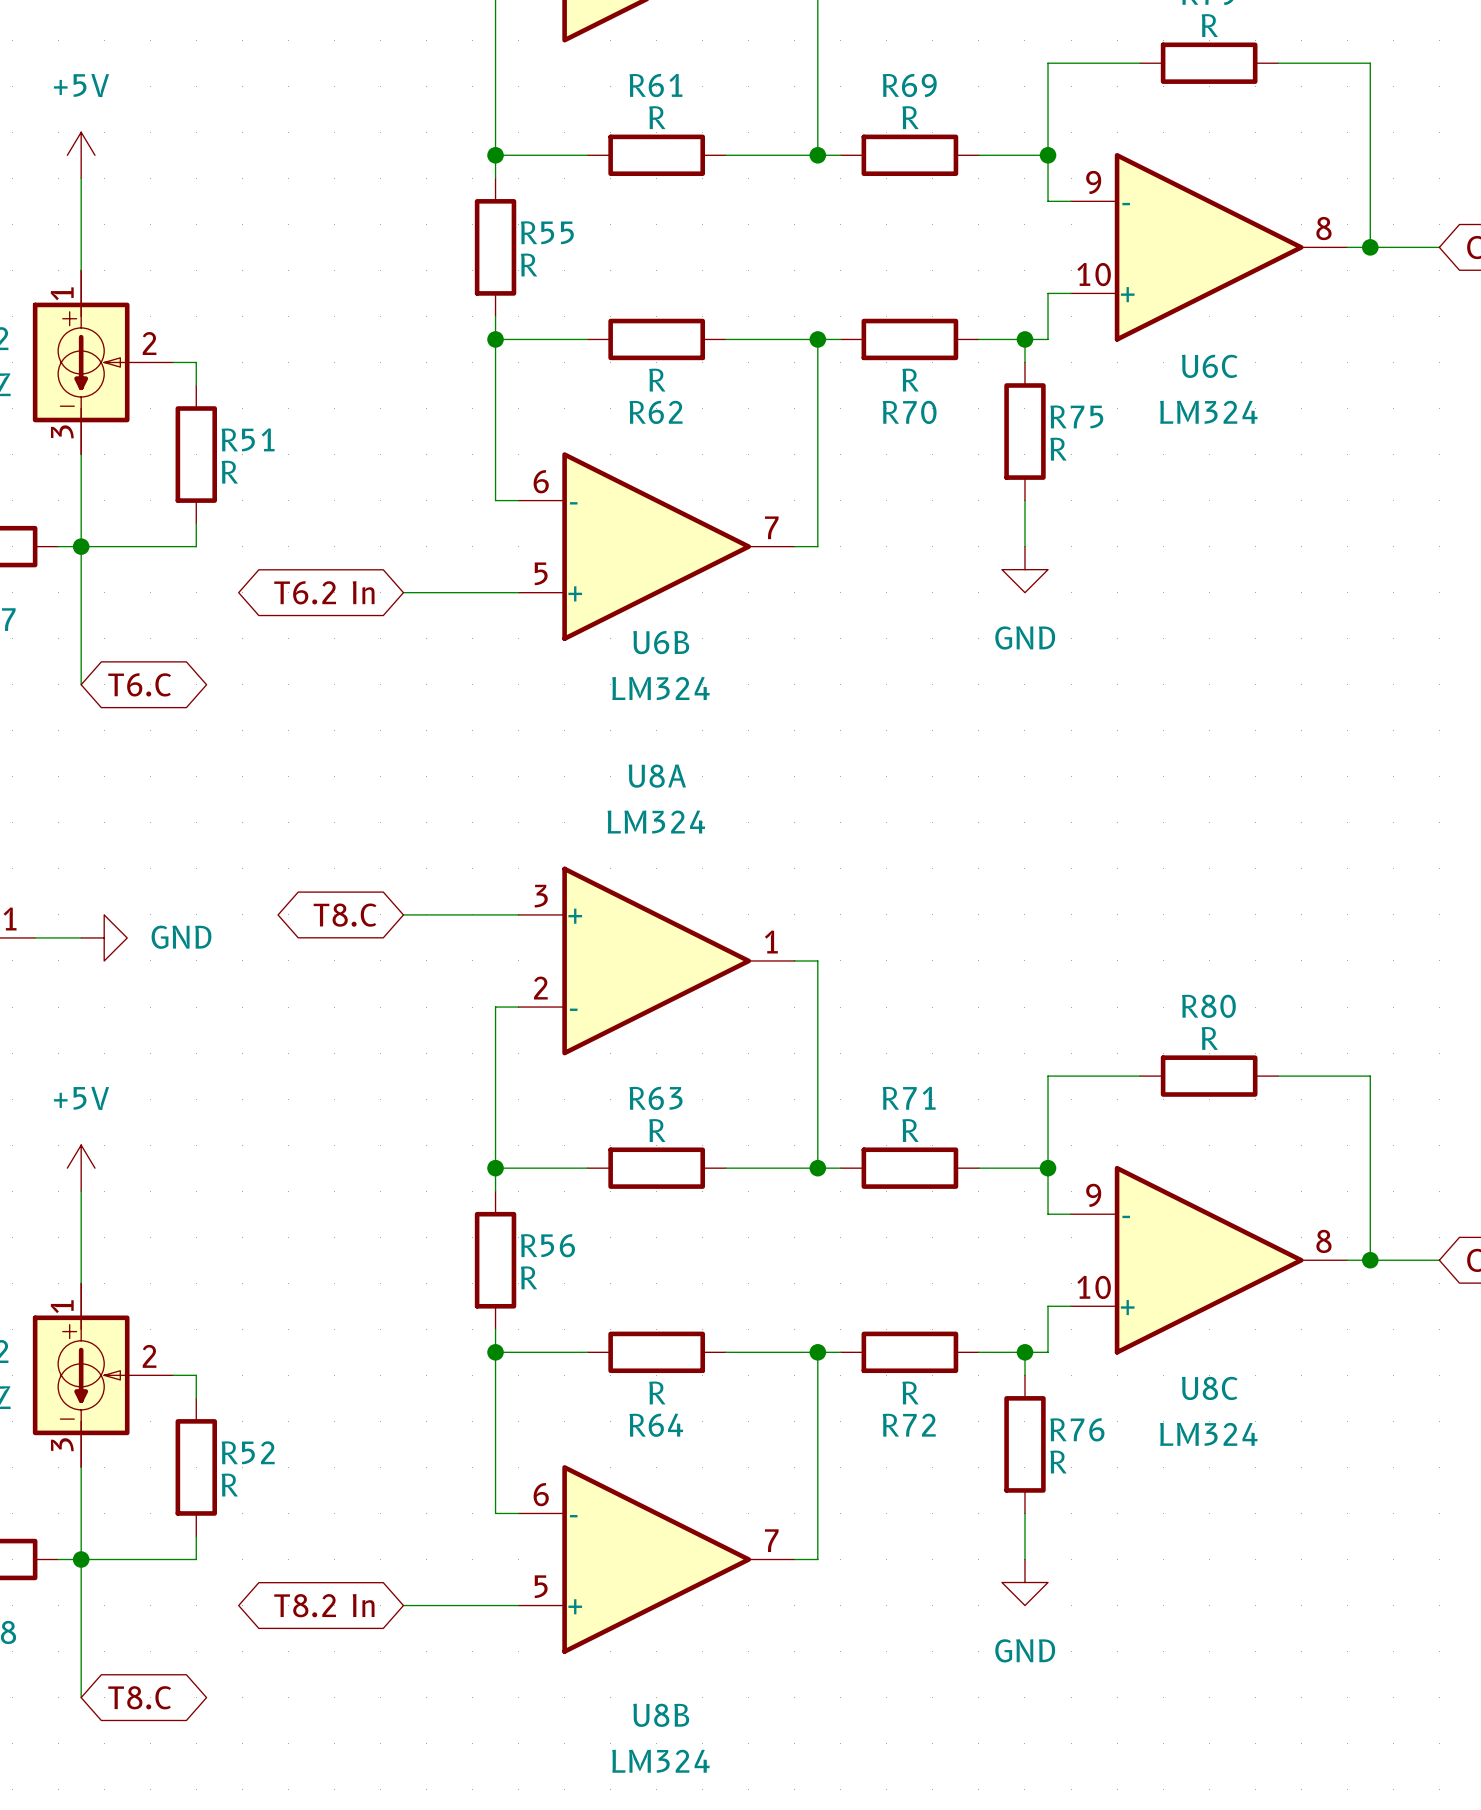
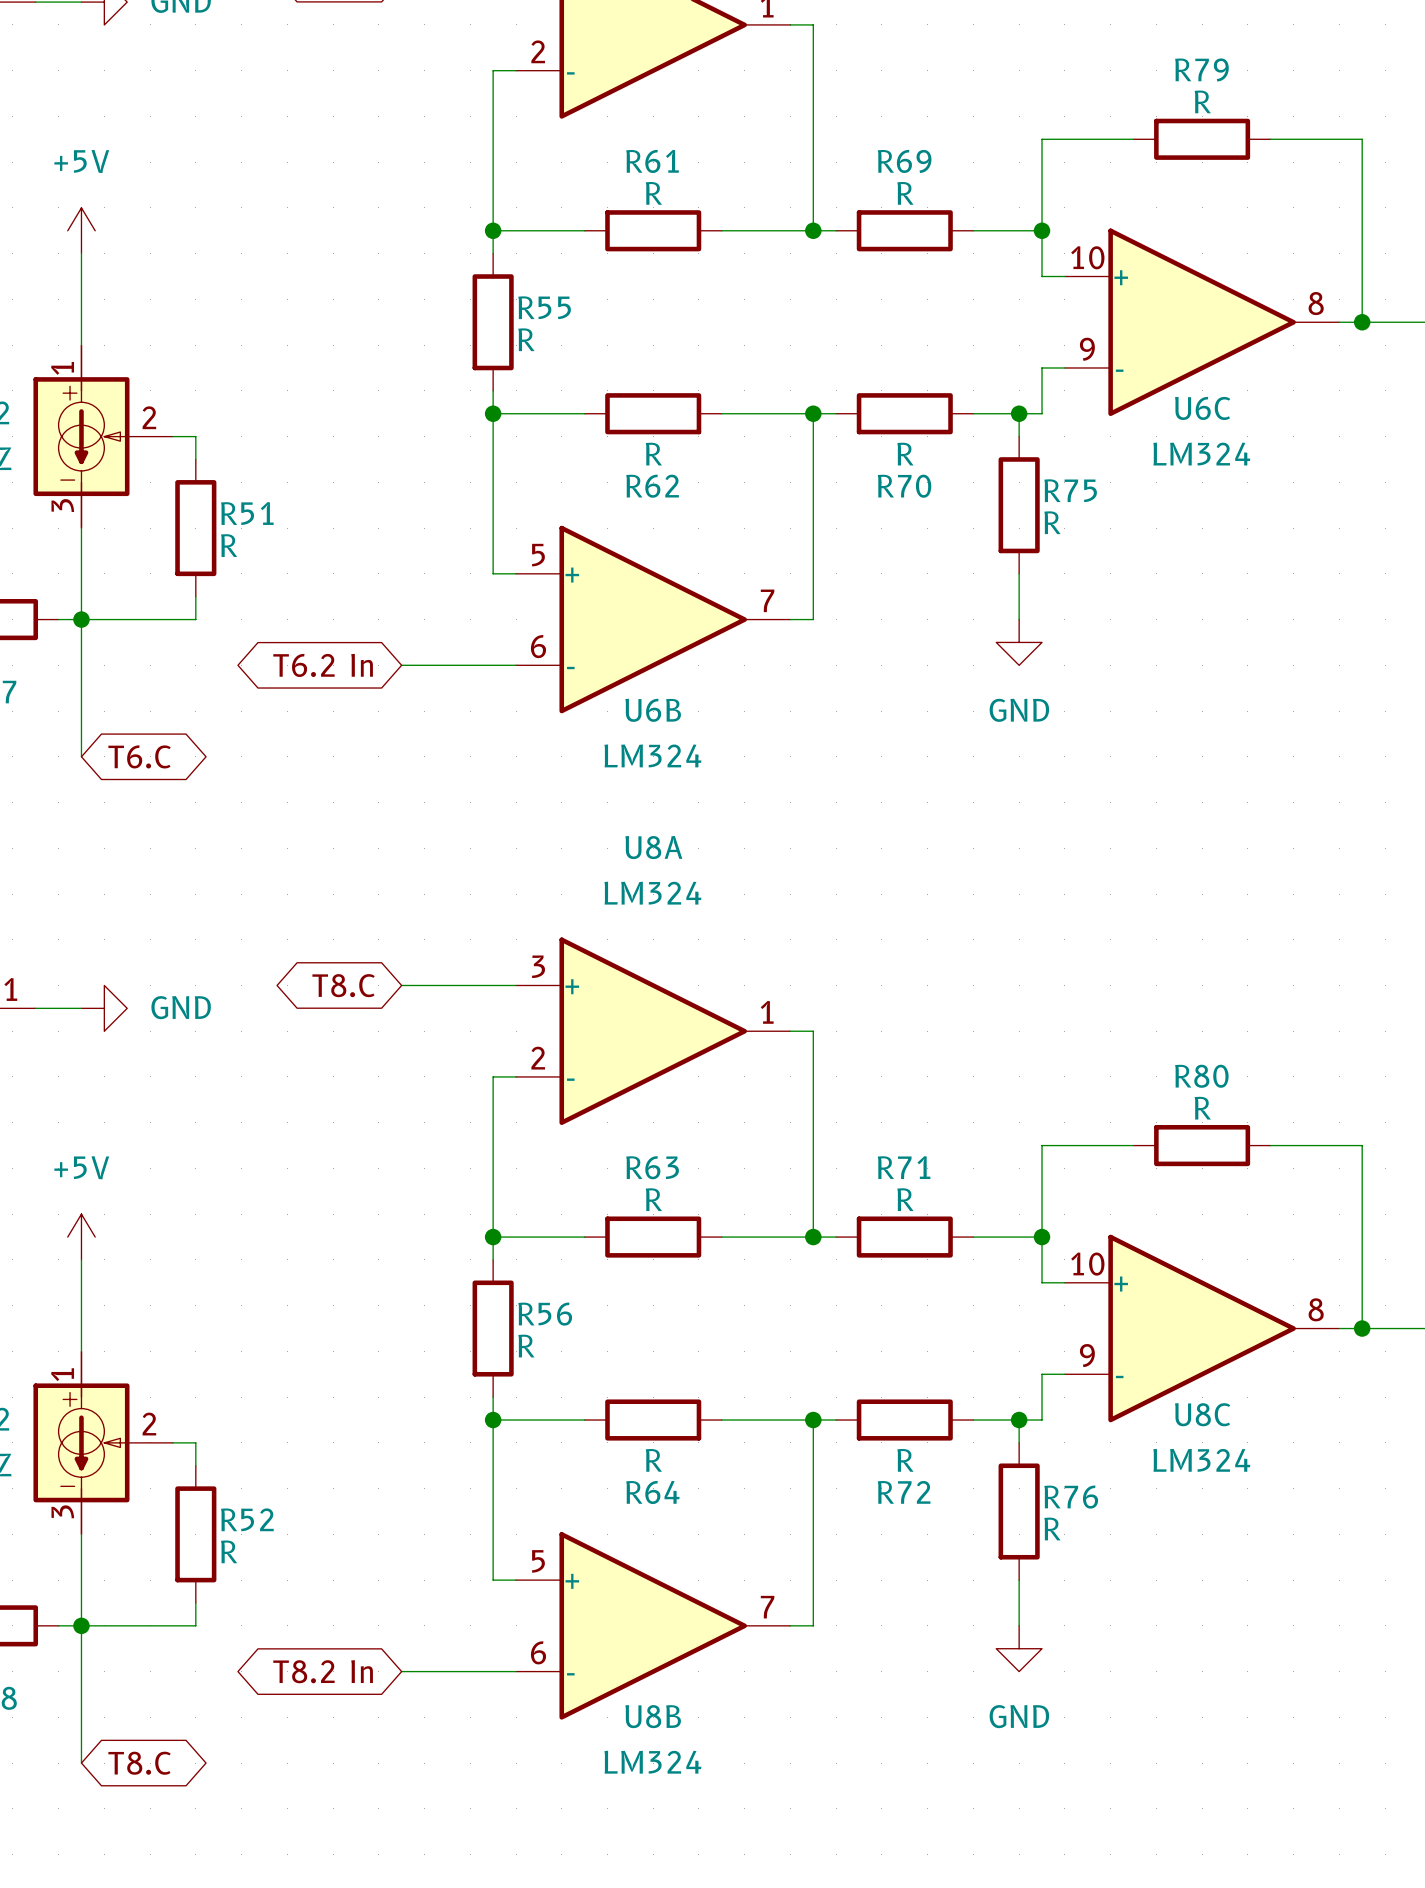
U6C flip: as is (1209, 247) -> up-down (1202, 322)
U6B flip: as is (656, 546) -> up-down (653, 619)
U8C flip: as is (1209, 1260) -> up-down (1202, 1328)
U8C name position: U8C (1209, 1388) -> U8C (1202, 1414)
U8C value position: LM324 (1208, 1434) -> LM324 (1201, 1460)
U8B flip: as is (656, 1559) -> up-down (653, 1625)
U8B name position: U8B (661, 1715) -> U8B (653, 1716)
U8B value position: LM324 (660, 1761) -> LM324 (652, 1762)

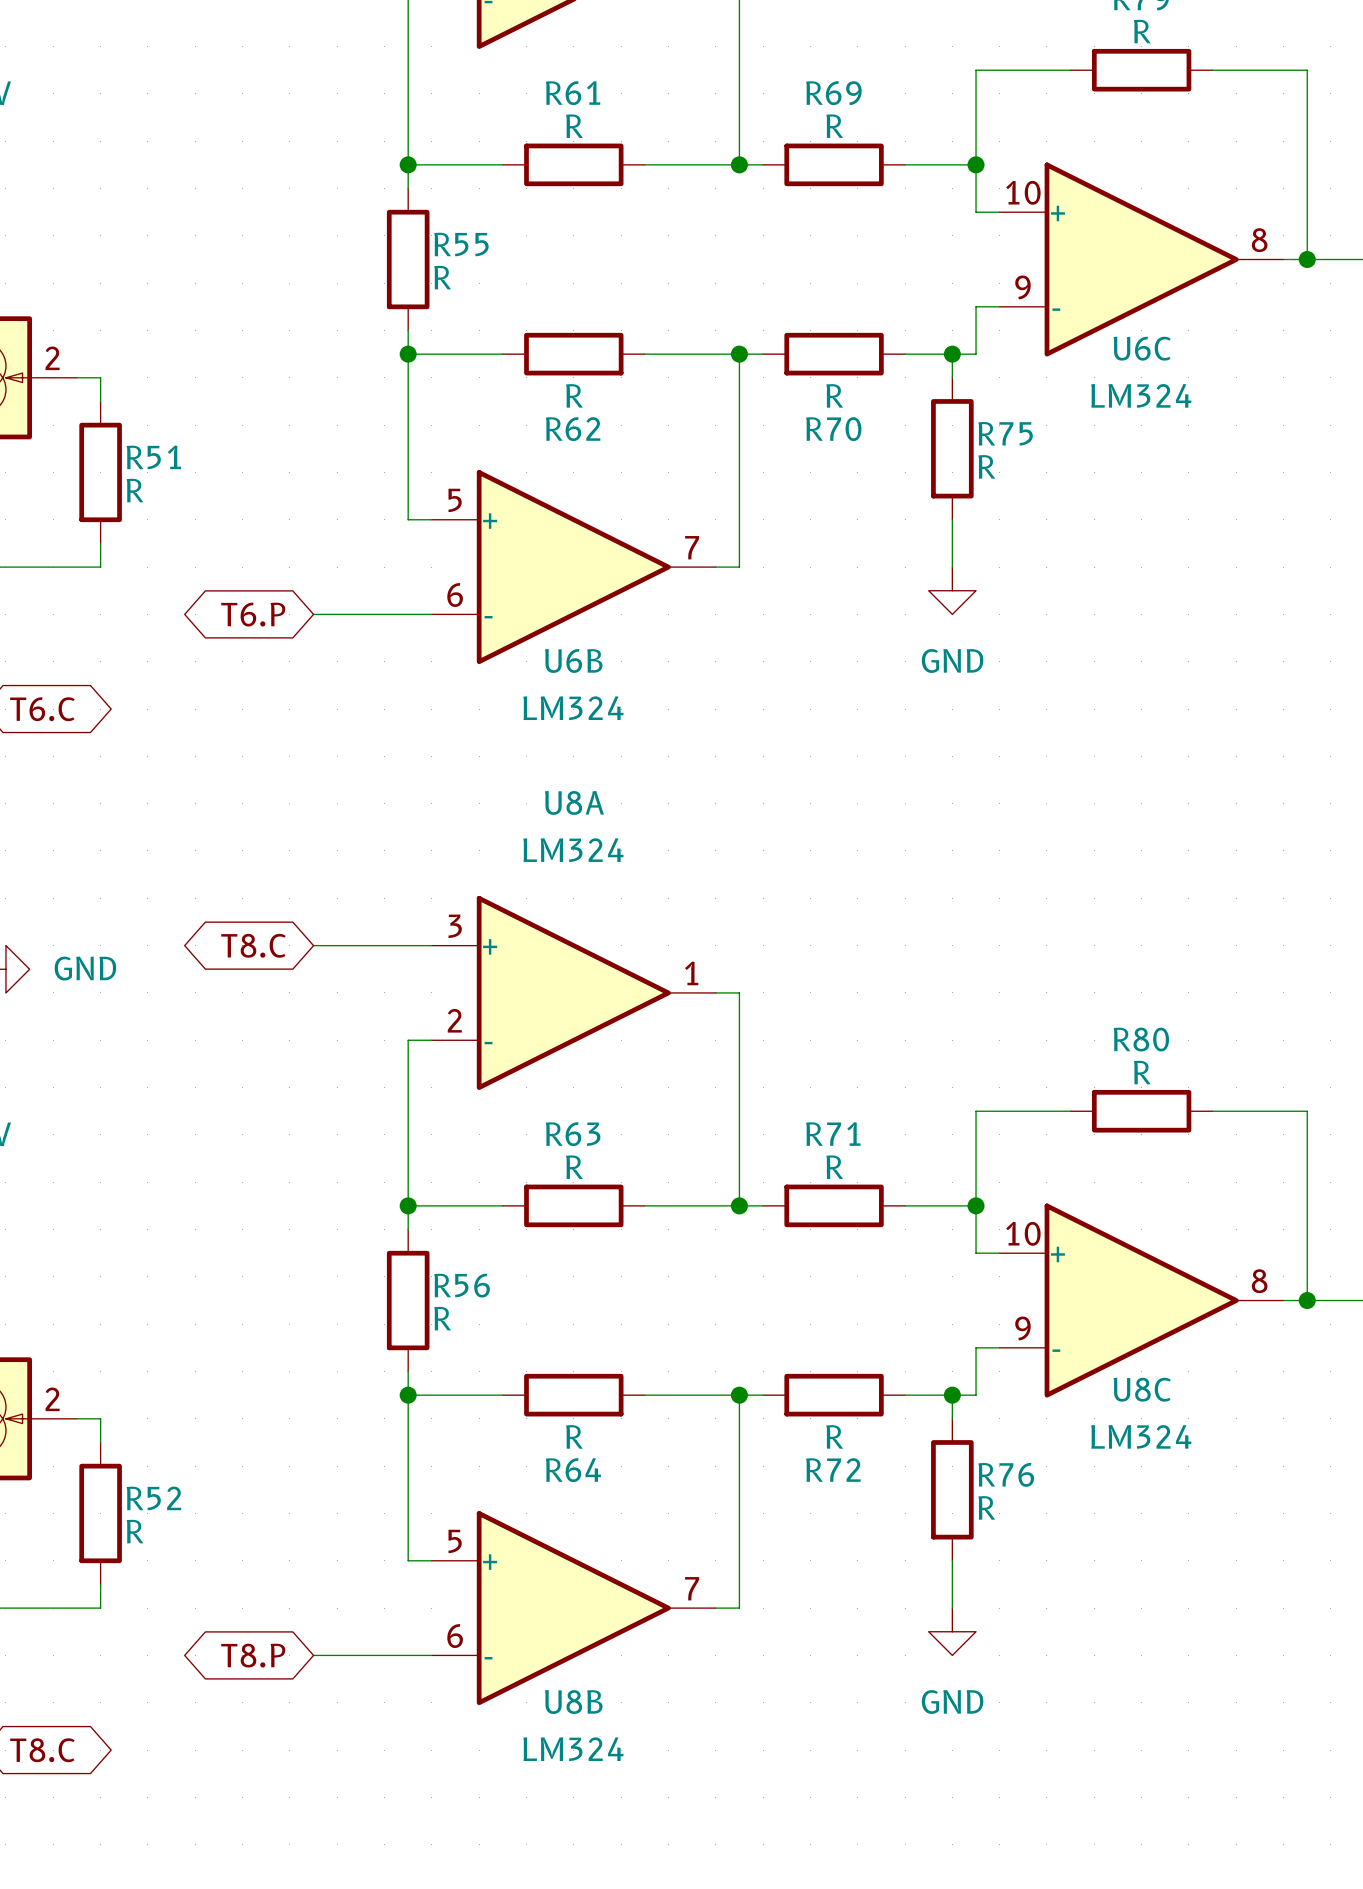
global label: T6.2 In (323, 665) -> T6.P (253, 614)
global label: T8.2 In (323, 1671) -> T8.P (253, 1655)

